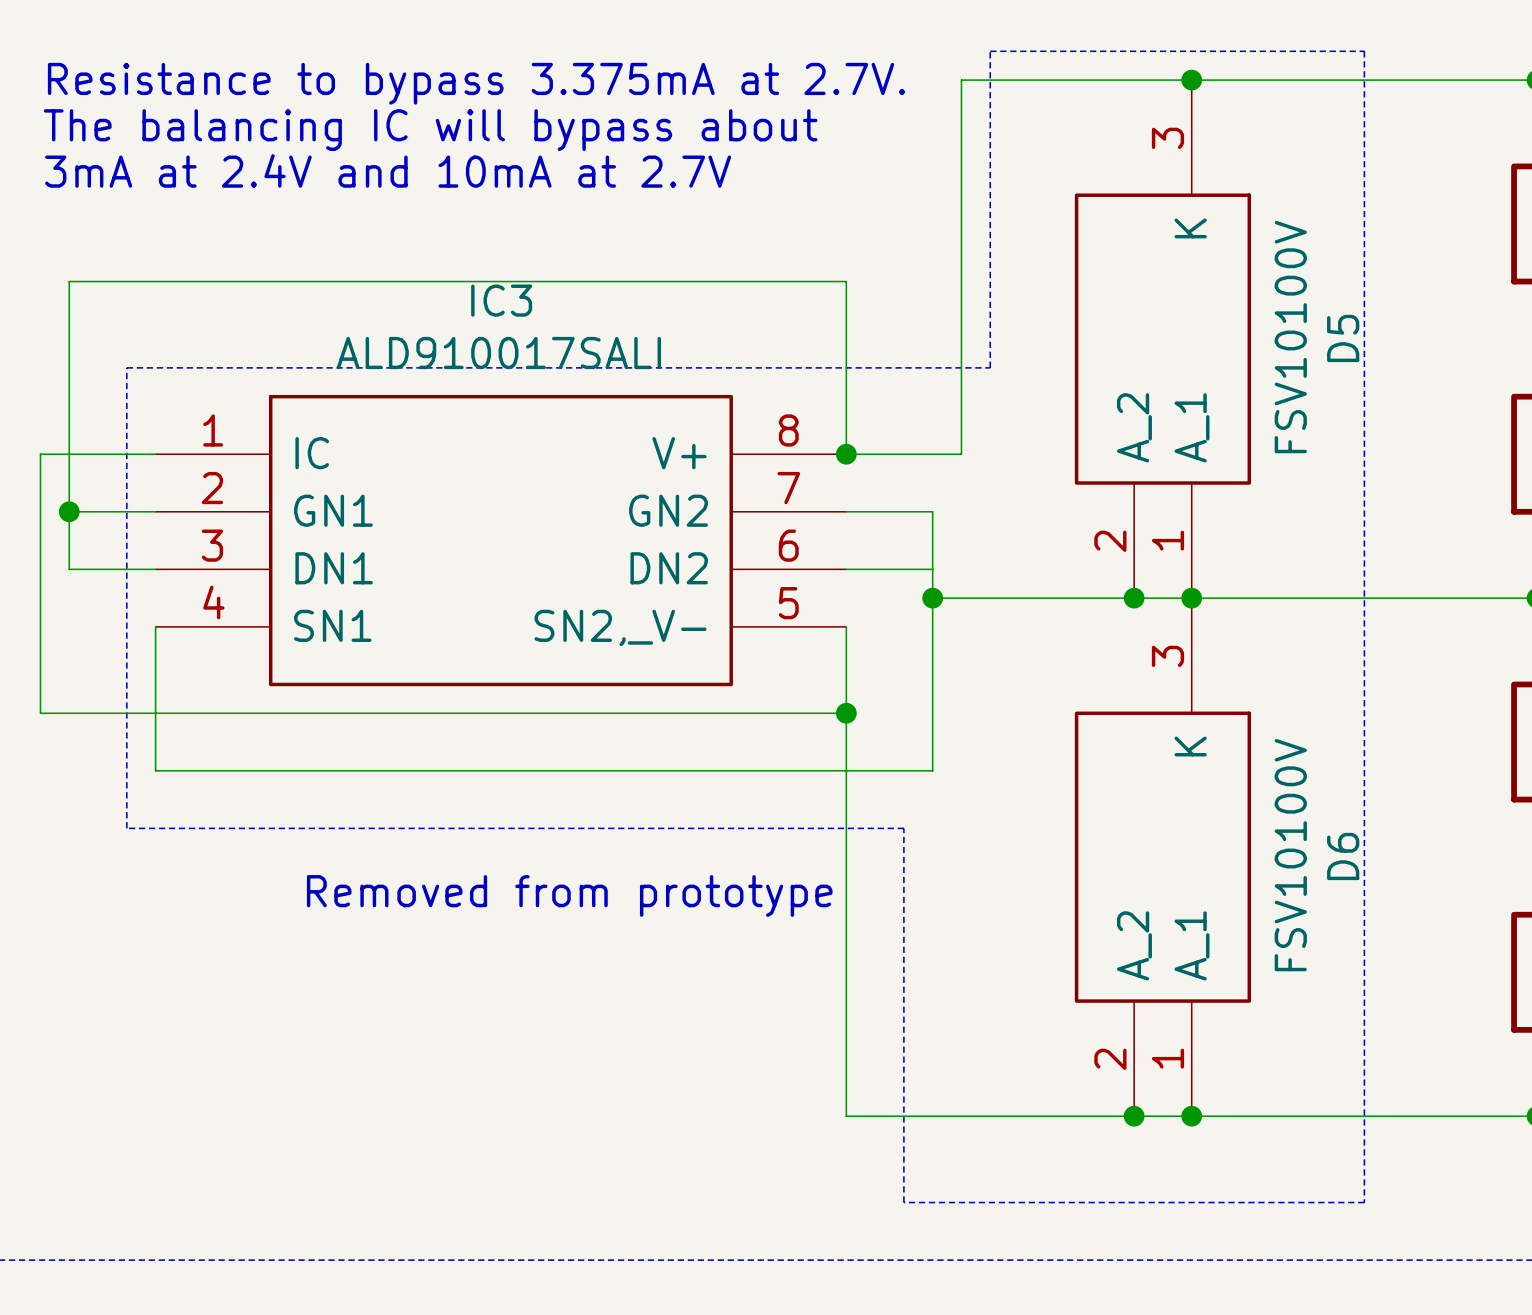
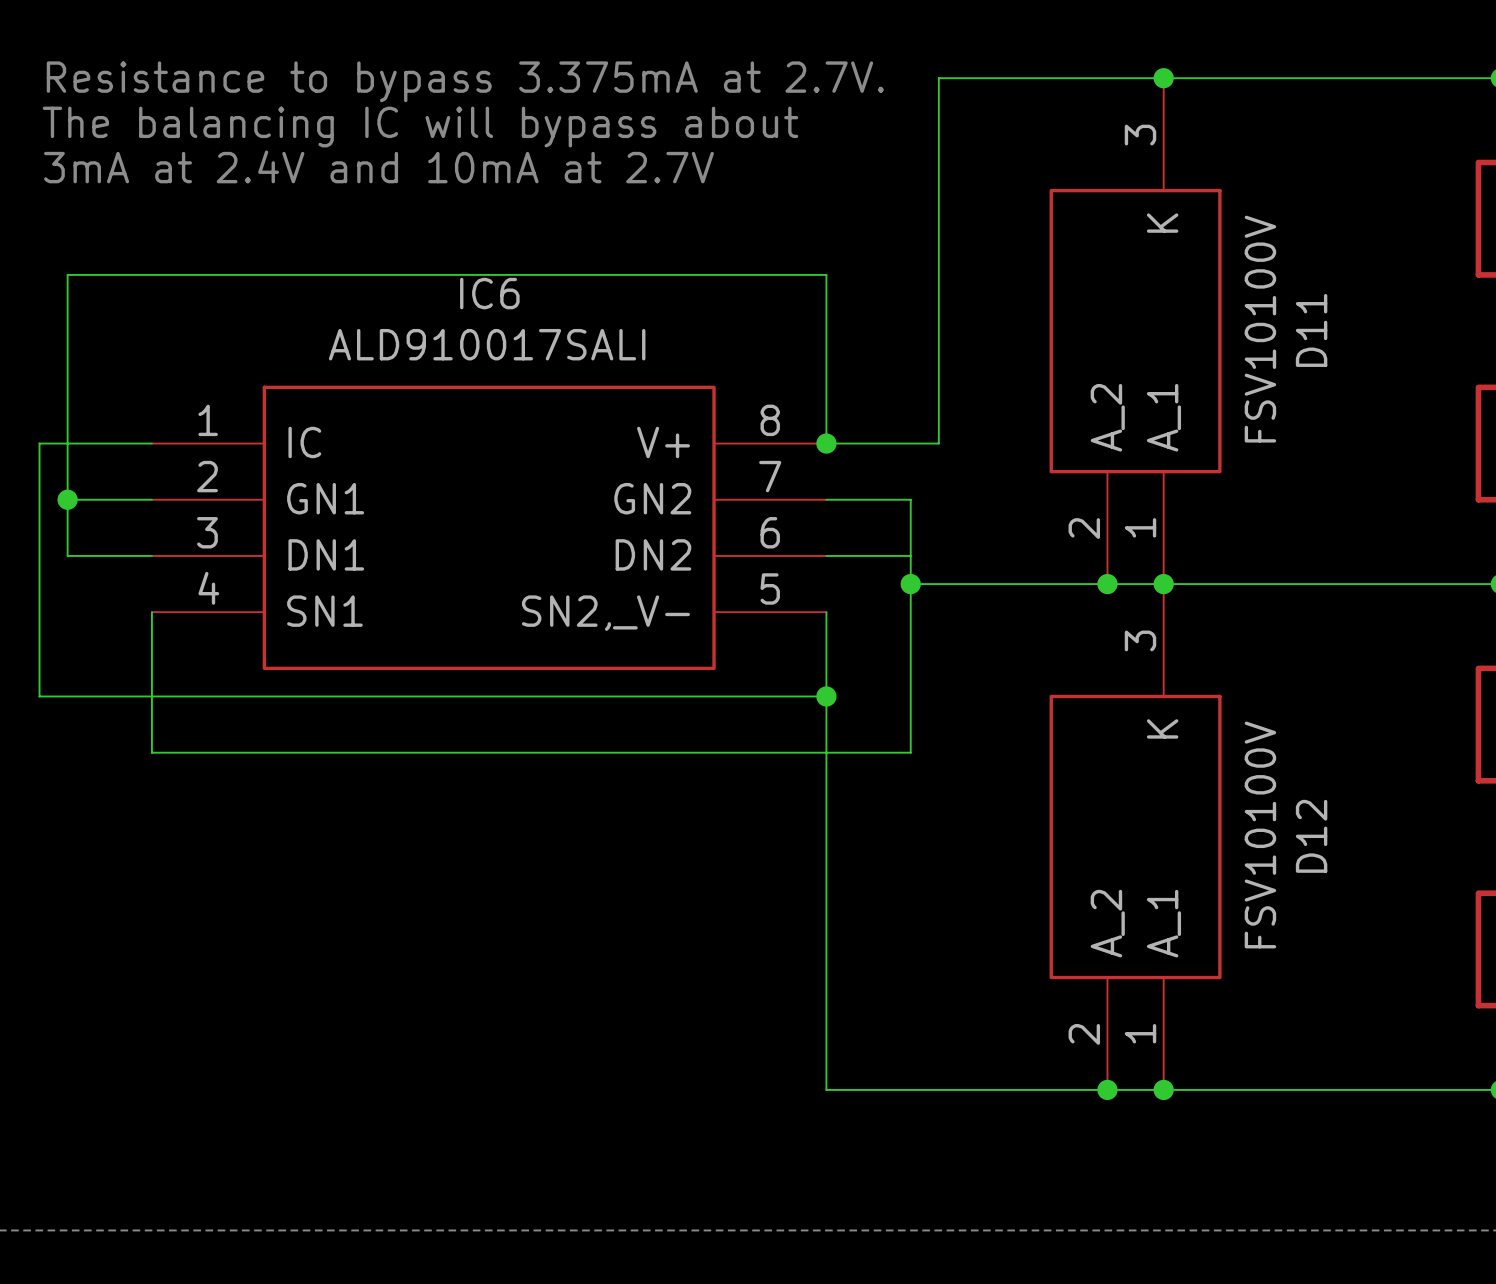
line: (990, 51) (990, 367) (126, 367) (126, 828) (903, 828) (903, 1202) (1364, 1202) (1364, 51) (990, 51) -> none
IC3 name: IC3 (501, 300) -> IC6 (489, 293)
D5 name: D5 (1343, 338) -> D11 (1311, 330)
D6 name: D6 (1343, 856) -> D12 (1311, 836)
text: Removed from prototype (569, 895) -> none

